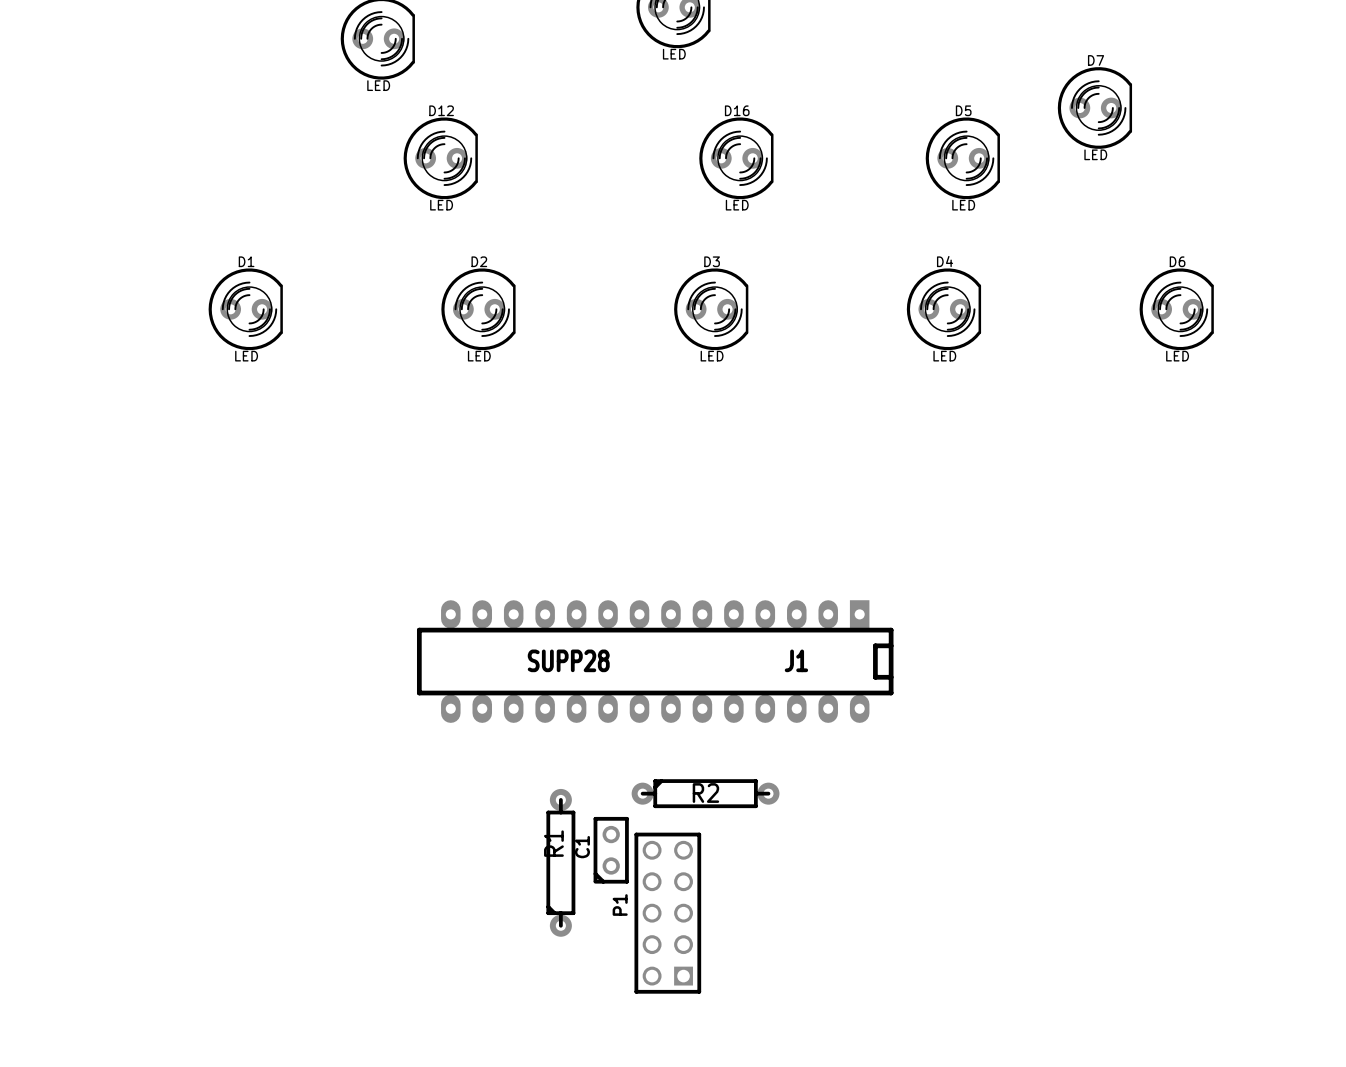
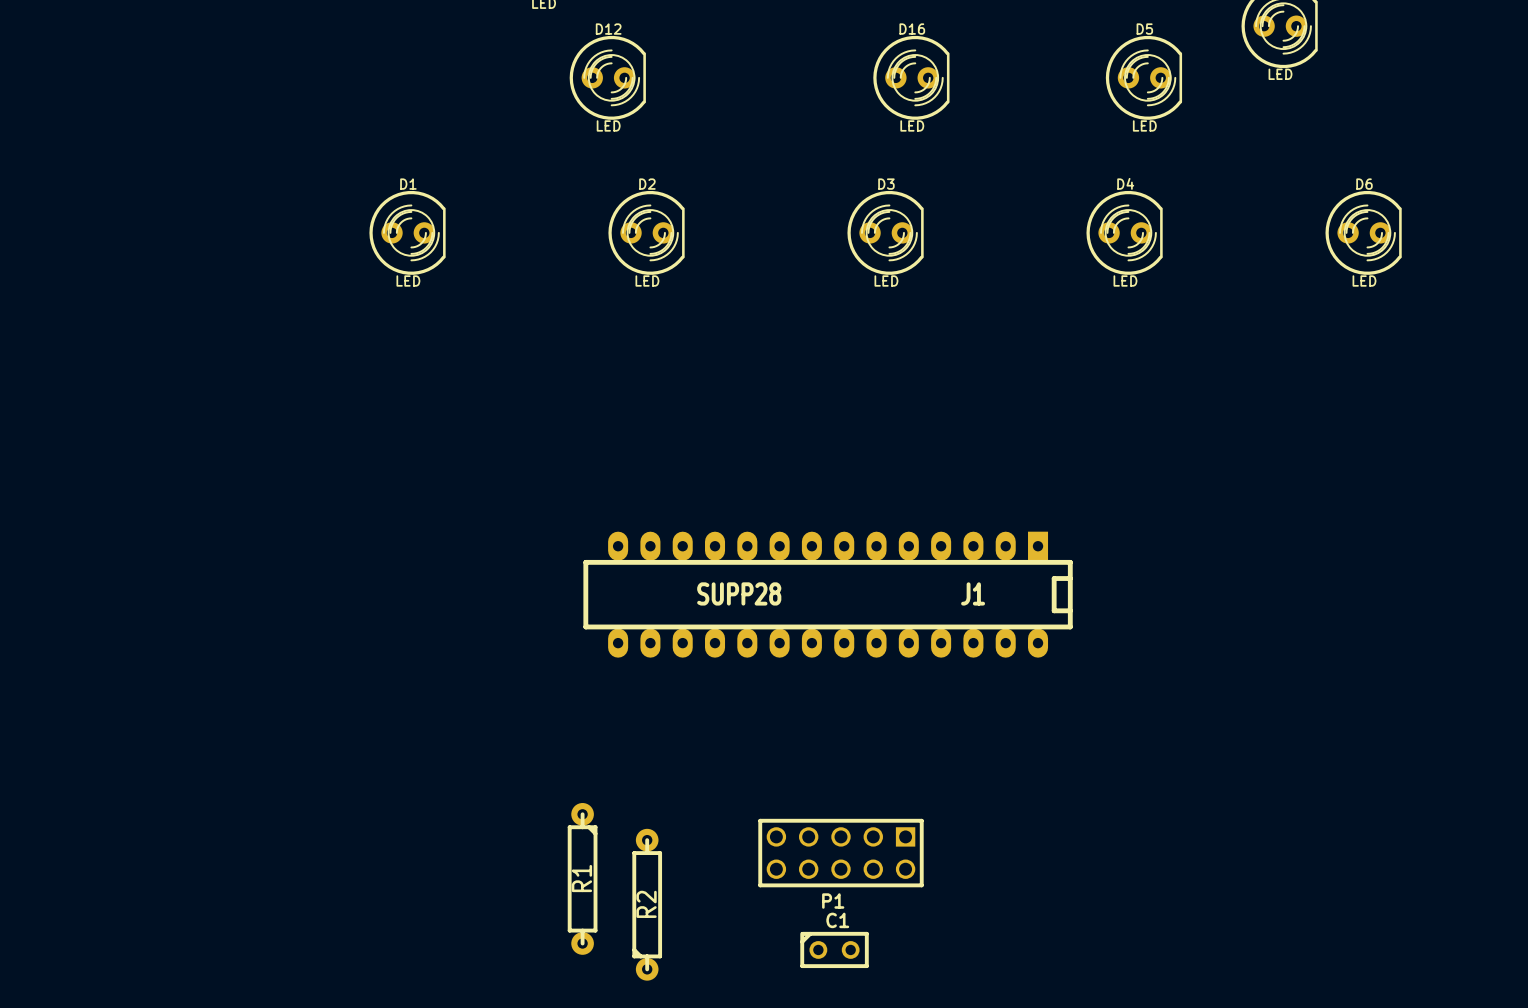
R2 rotation: 0° (705, 793) -> 90° counterclockwise (647, 904)
R2 position: (705, 793) -> (647, 904)
C1 rotation: 0° (611, 850) -> 90° clockwise (834, 949)
C1 position: (611, 850) -> (834, 949)
R1 rotation: 0° (560, 862) -> 180° (582, 878)
R1 position: (560, 862) -> (582, 878)
P1 rotation: 0° (667, 913) -> 90° counterclockwise (840, 853)

